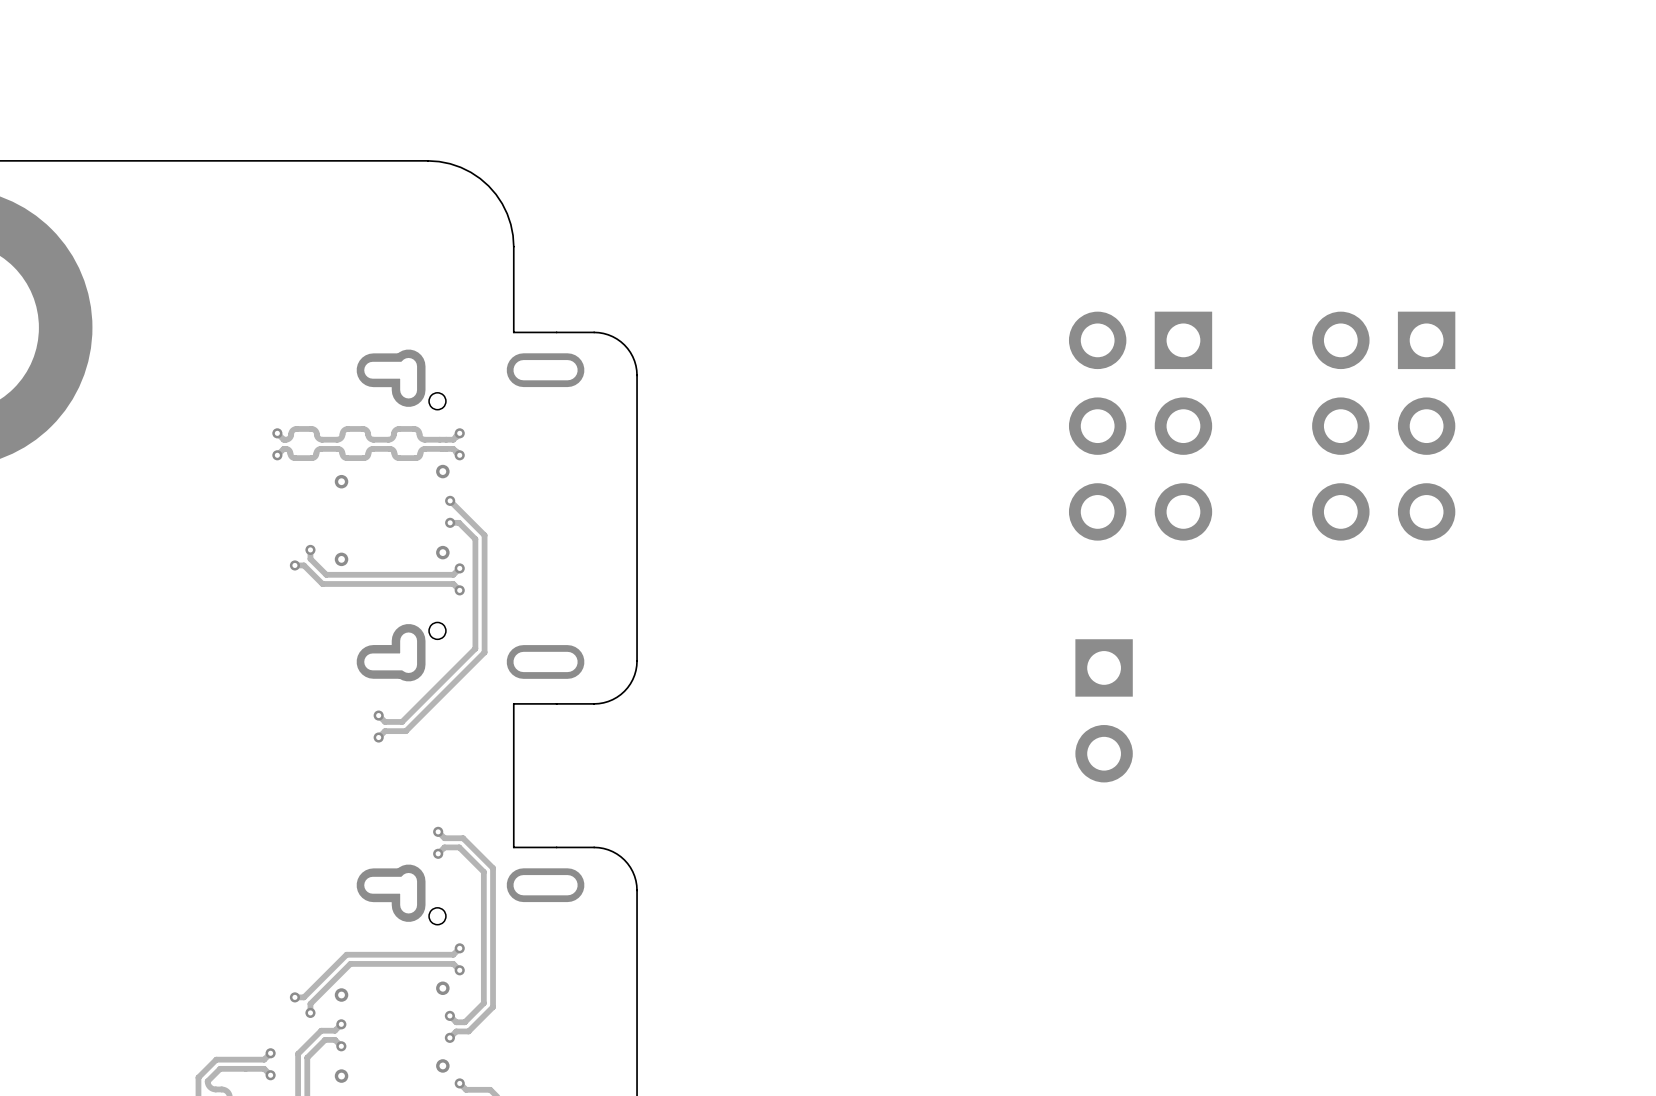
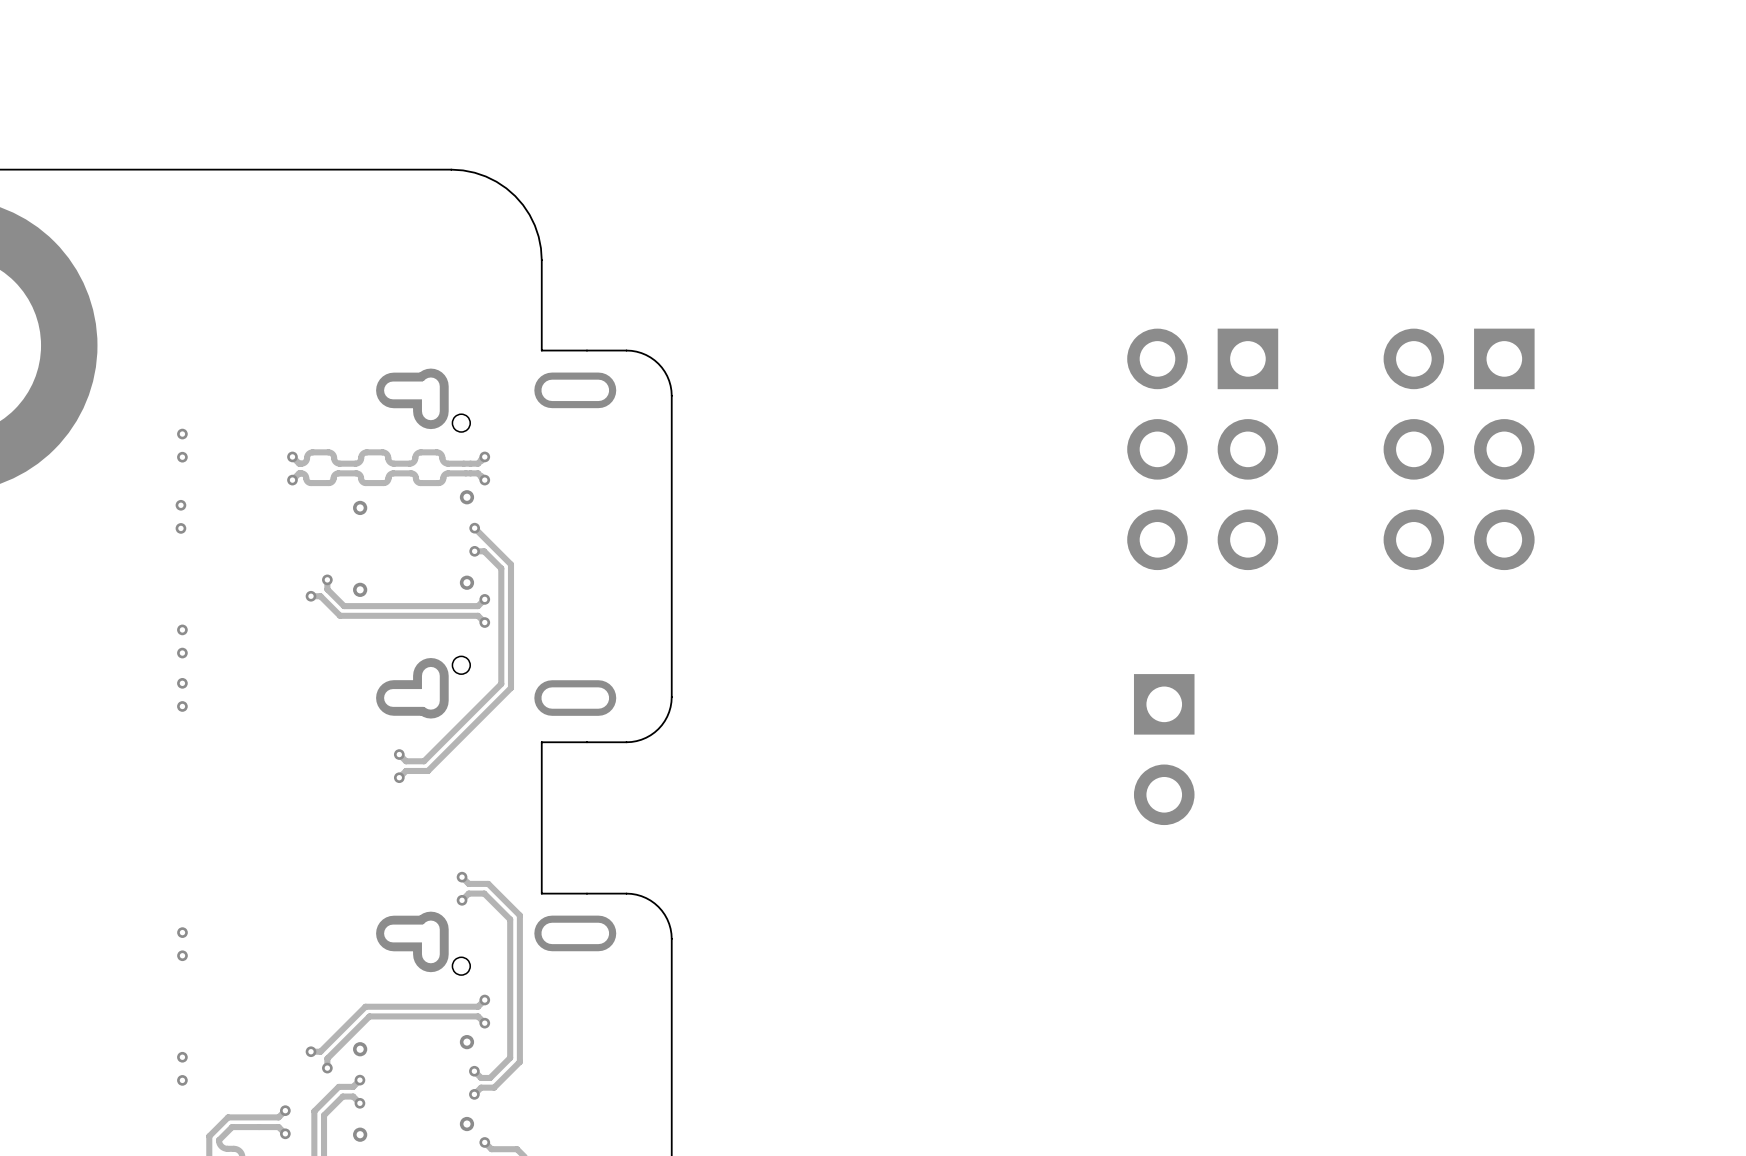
via: none -> (182, 434)
via: none -> (182, 457)
via: none -> (180, 505)
via: none -> (180, 528)
via: none -> (182, 629)
via: none -> (182, 653)
via: none -> (182, 683)
via: none -> (182, 706)
via: none -> (182, 932)
via: none -> (182, 955)
via: none -> (182, 1057)
via: none -> (182, 1080)

